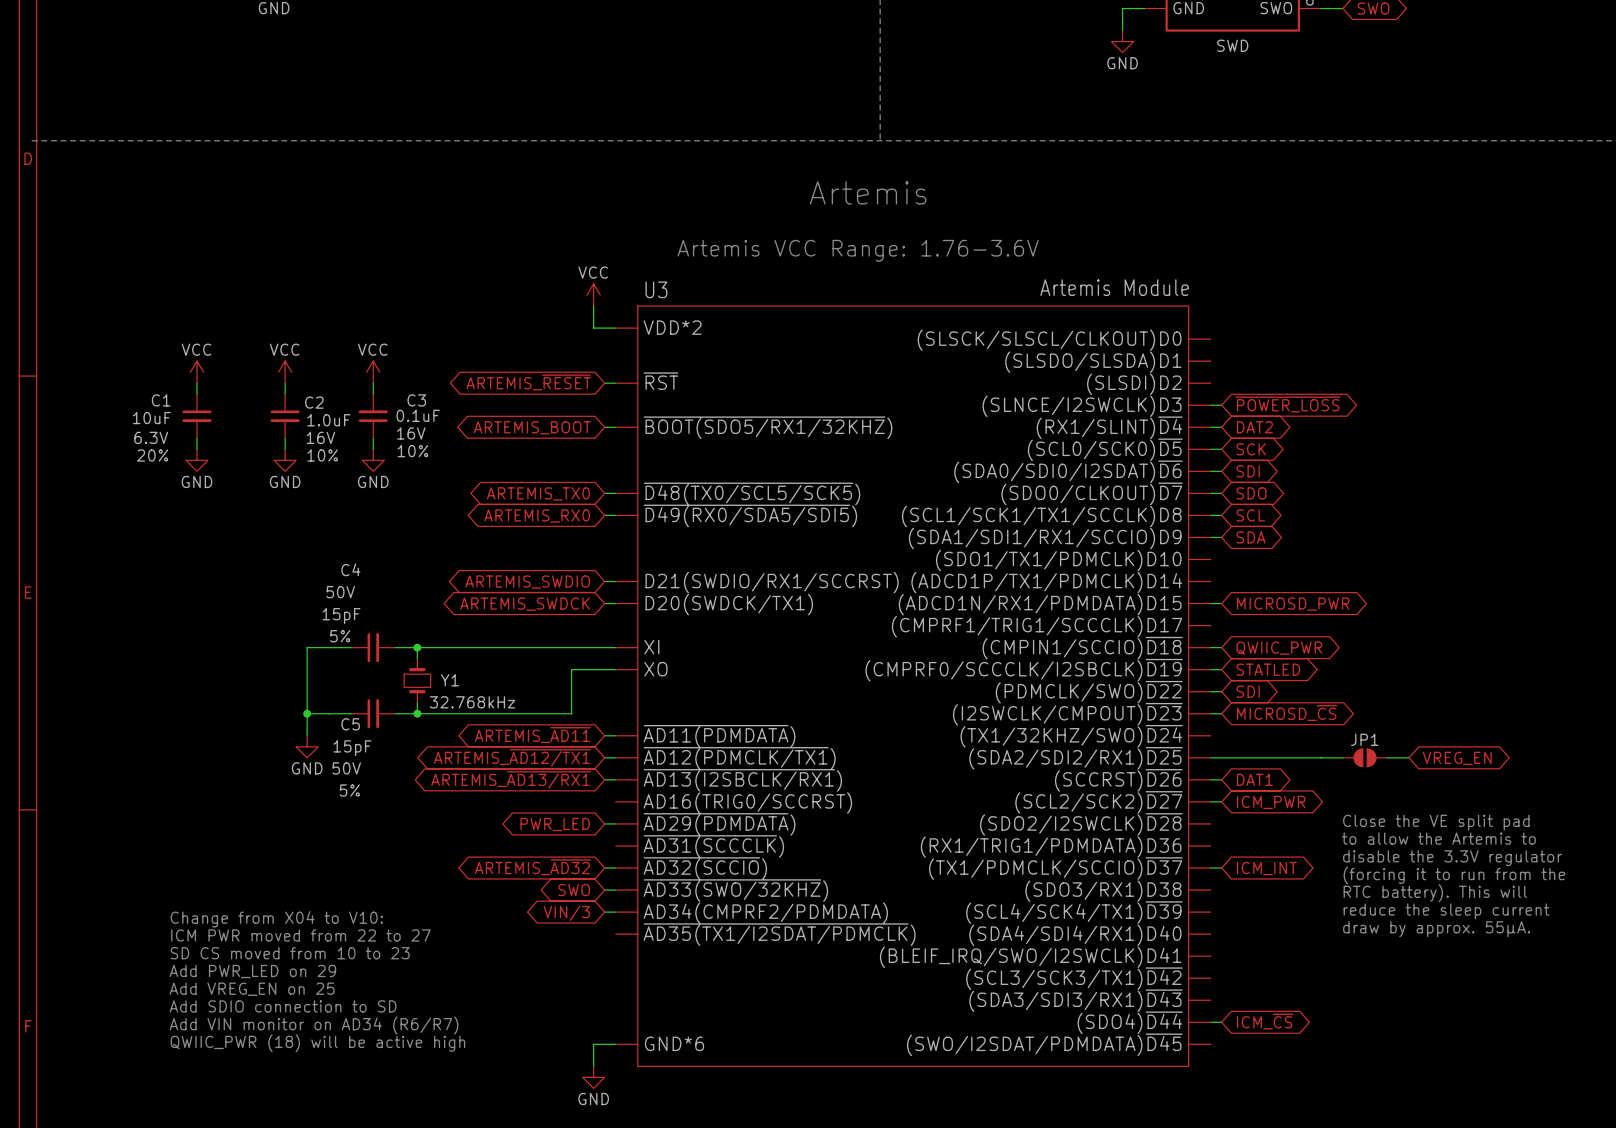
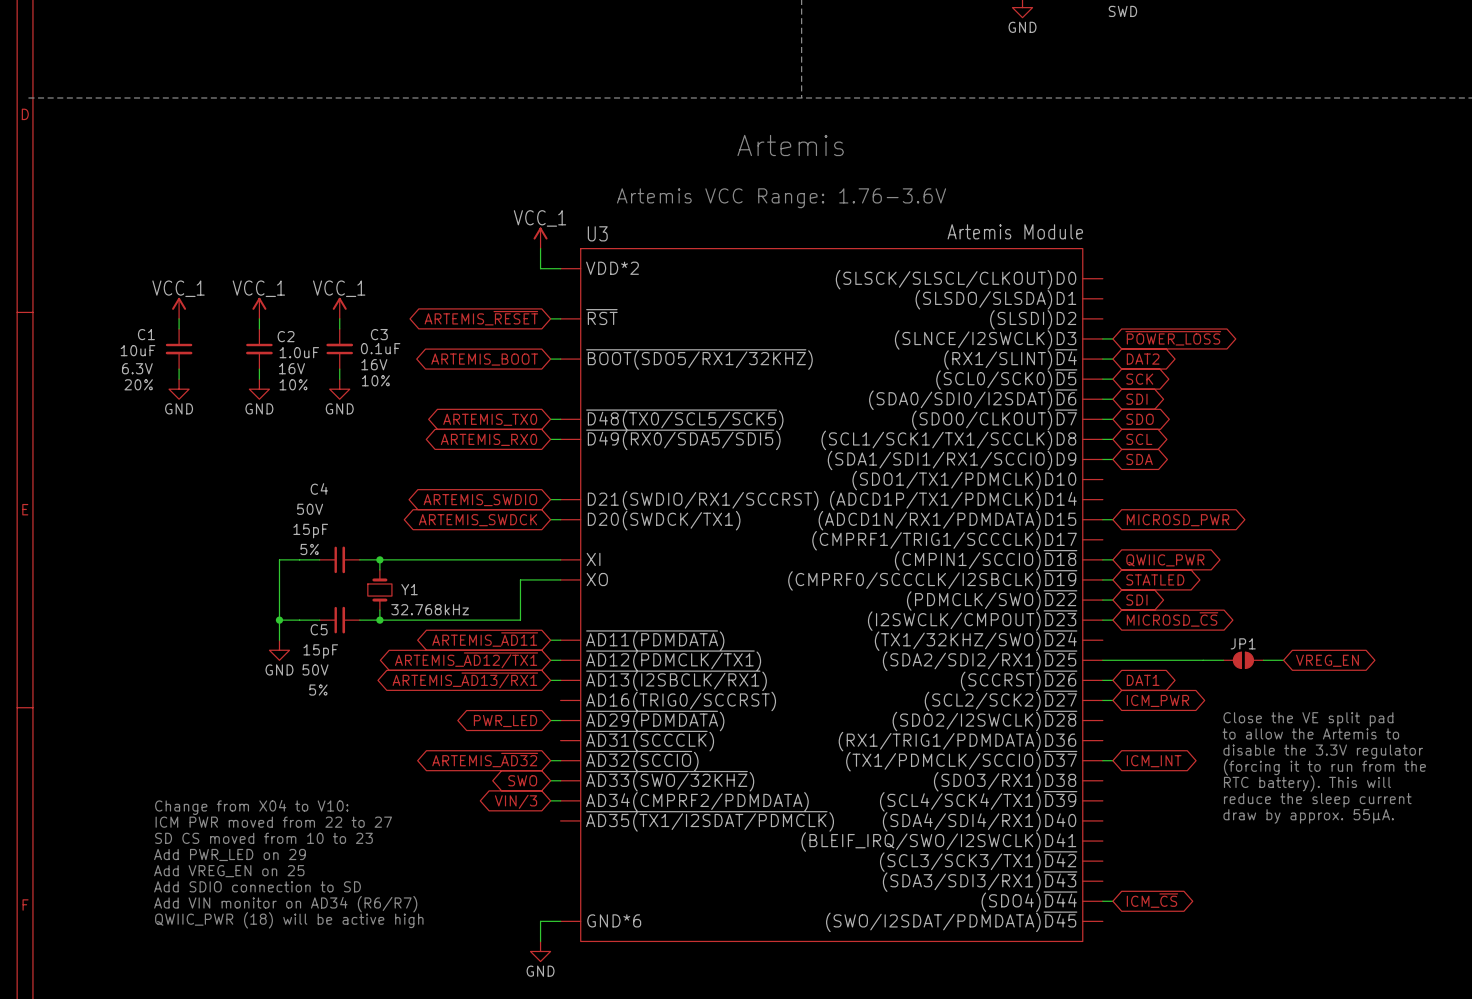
power symbol: VCC (593, 295) -> VCC_1 (540, 238)
power symbol: VCC (196, 372) -> VCC_1 (179, 308)
power symbol: VCC (285, 372) -> VCC_1 (259, 308)
power symbol: VCC (373, 372) -> VCC_1 (339, 308)

